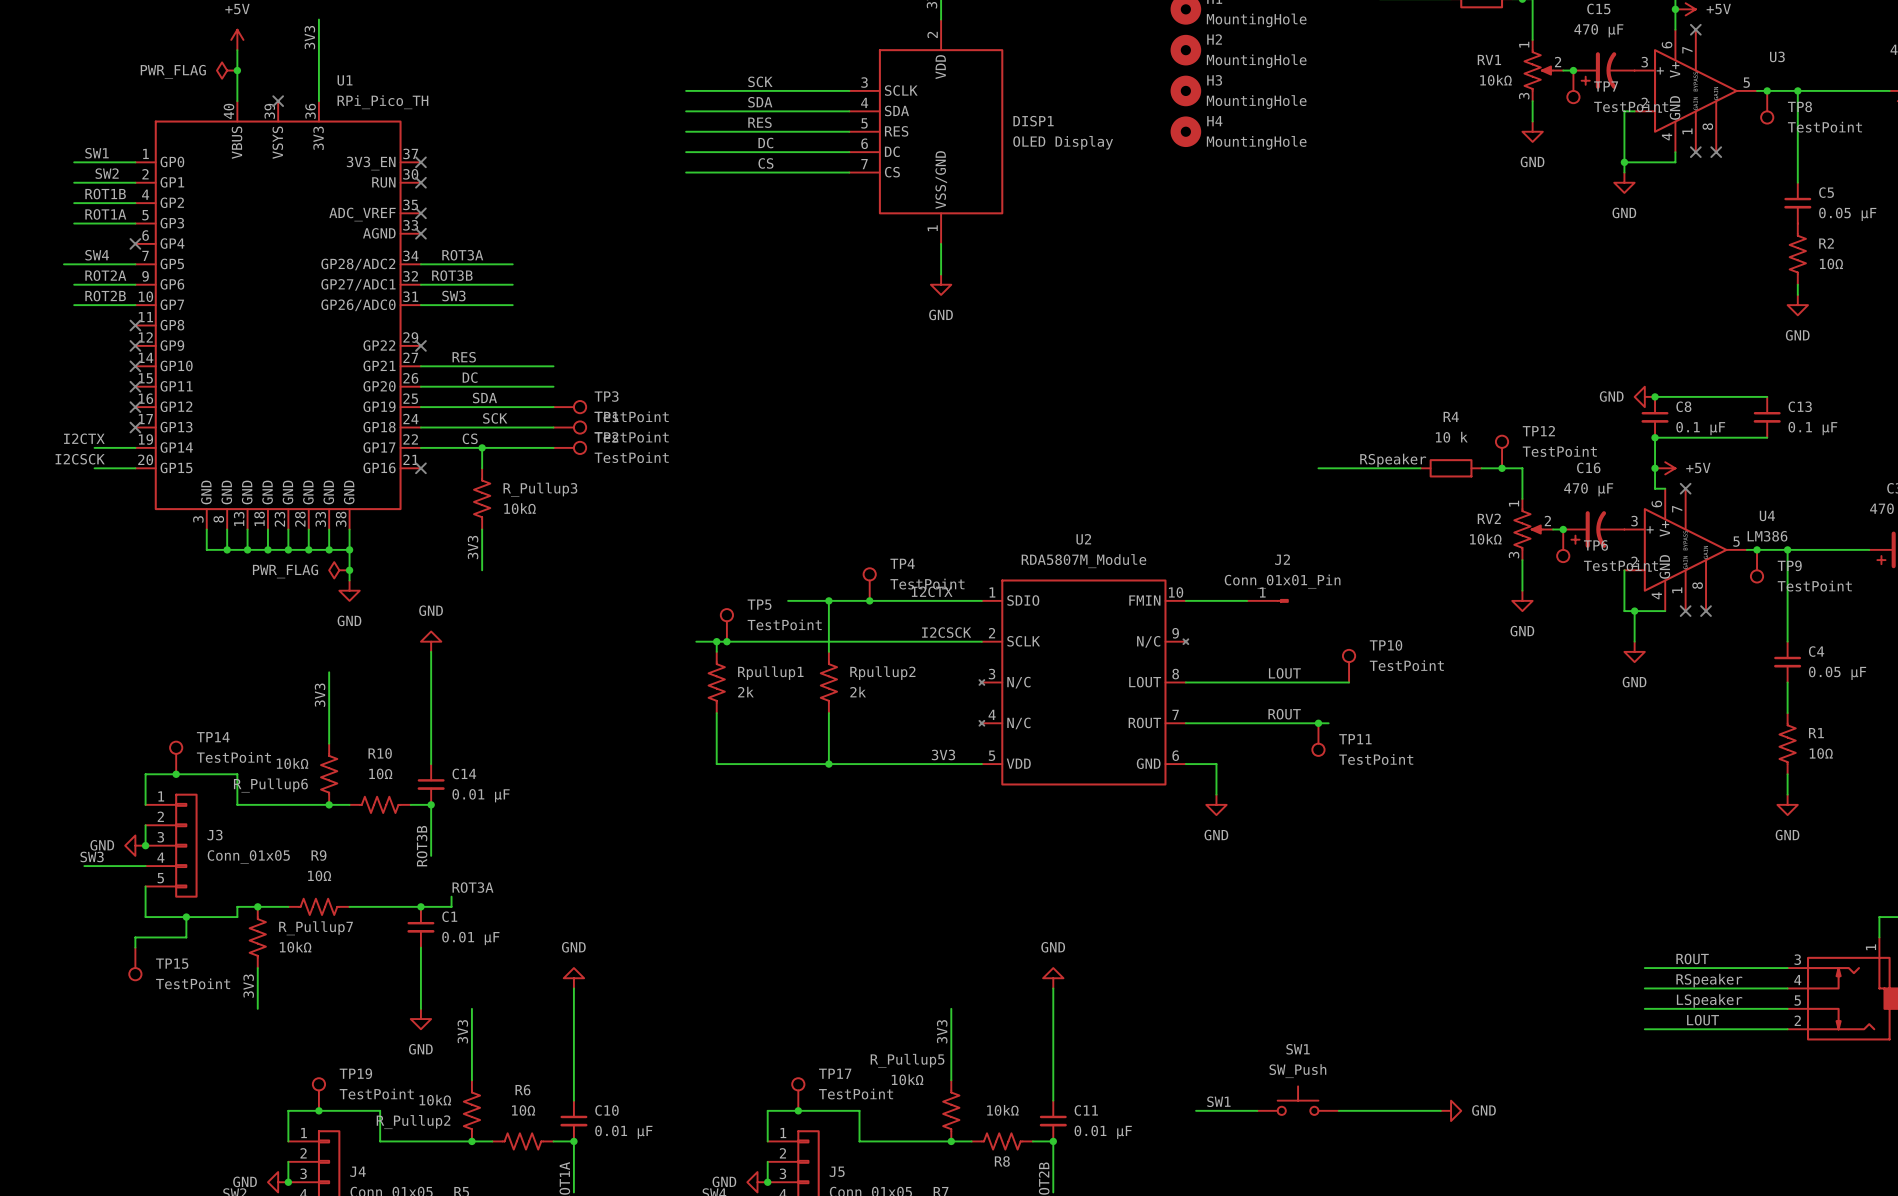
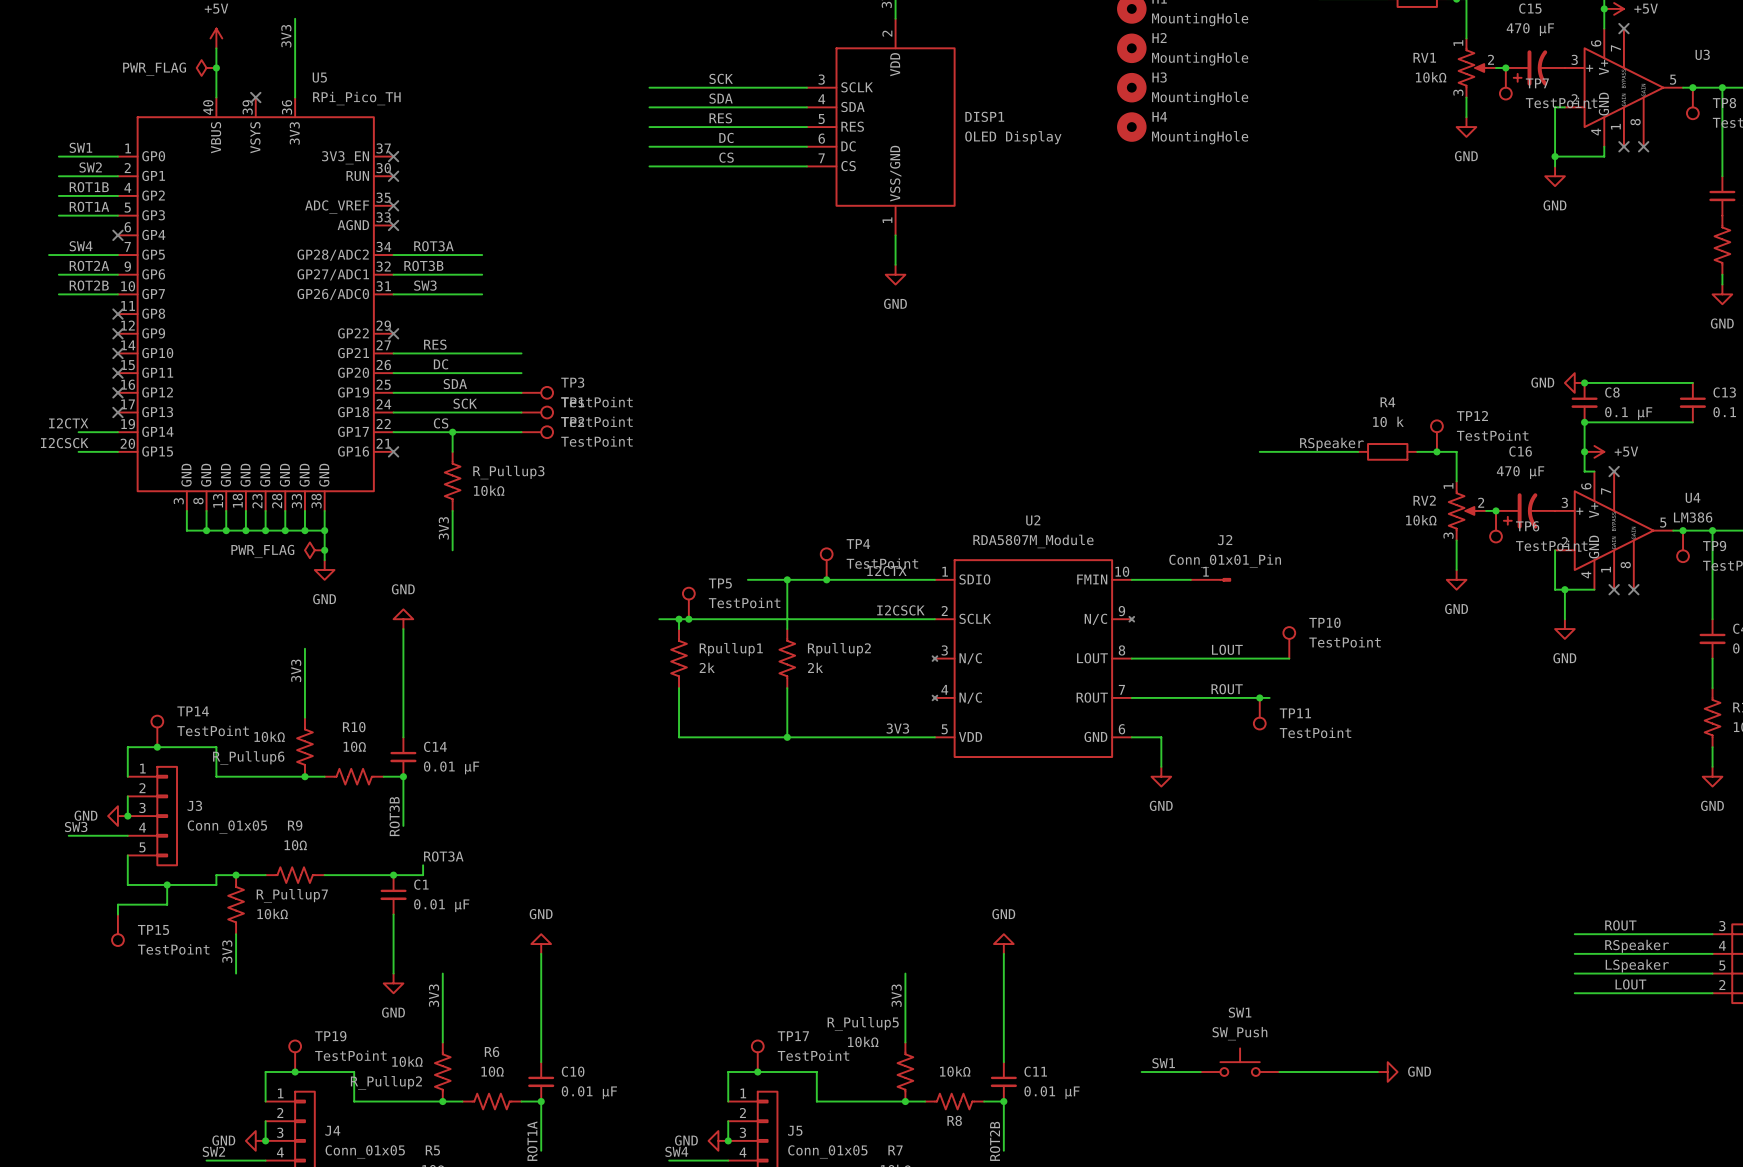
U1 name: U1 (345, 80) -> U5 (319, 77)

